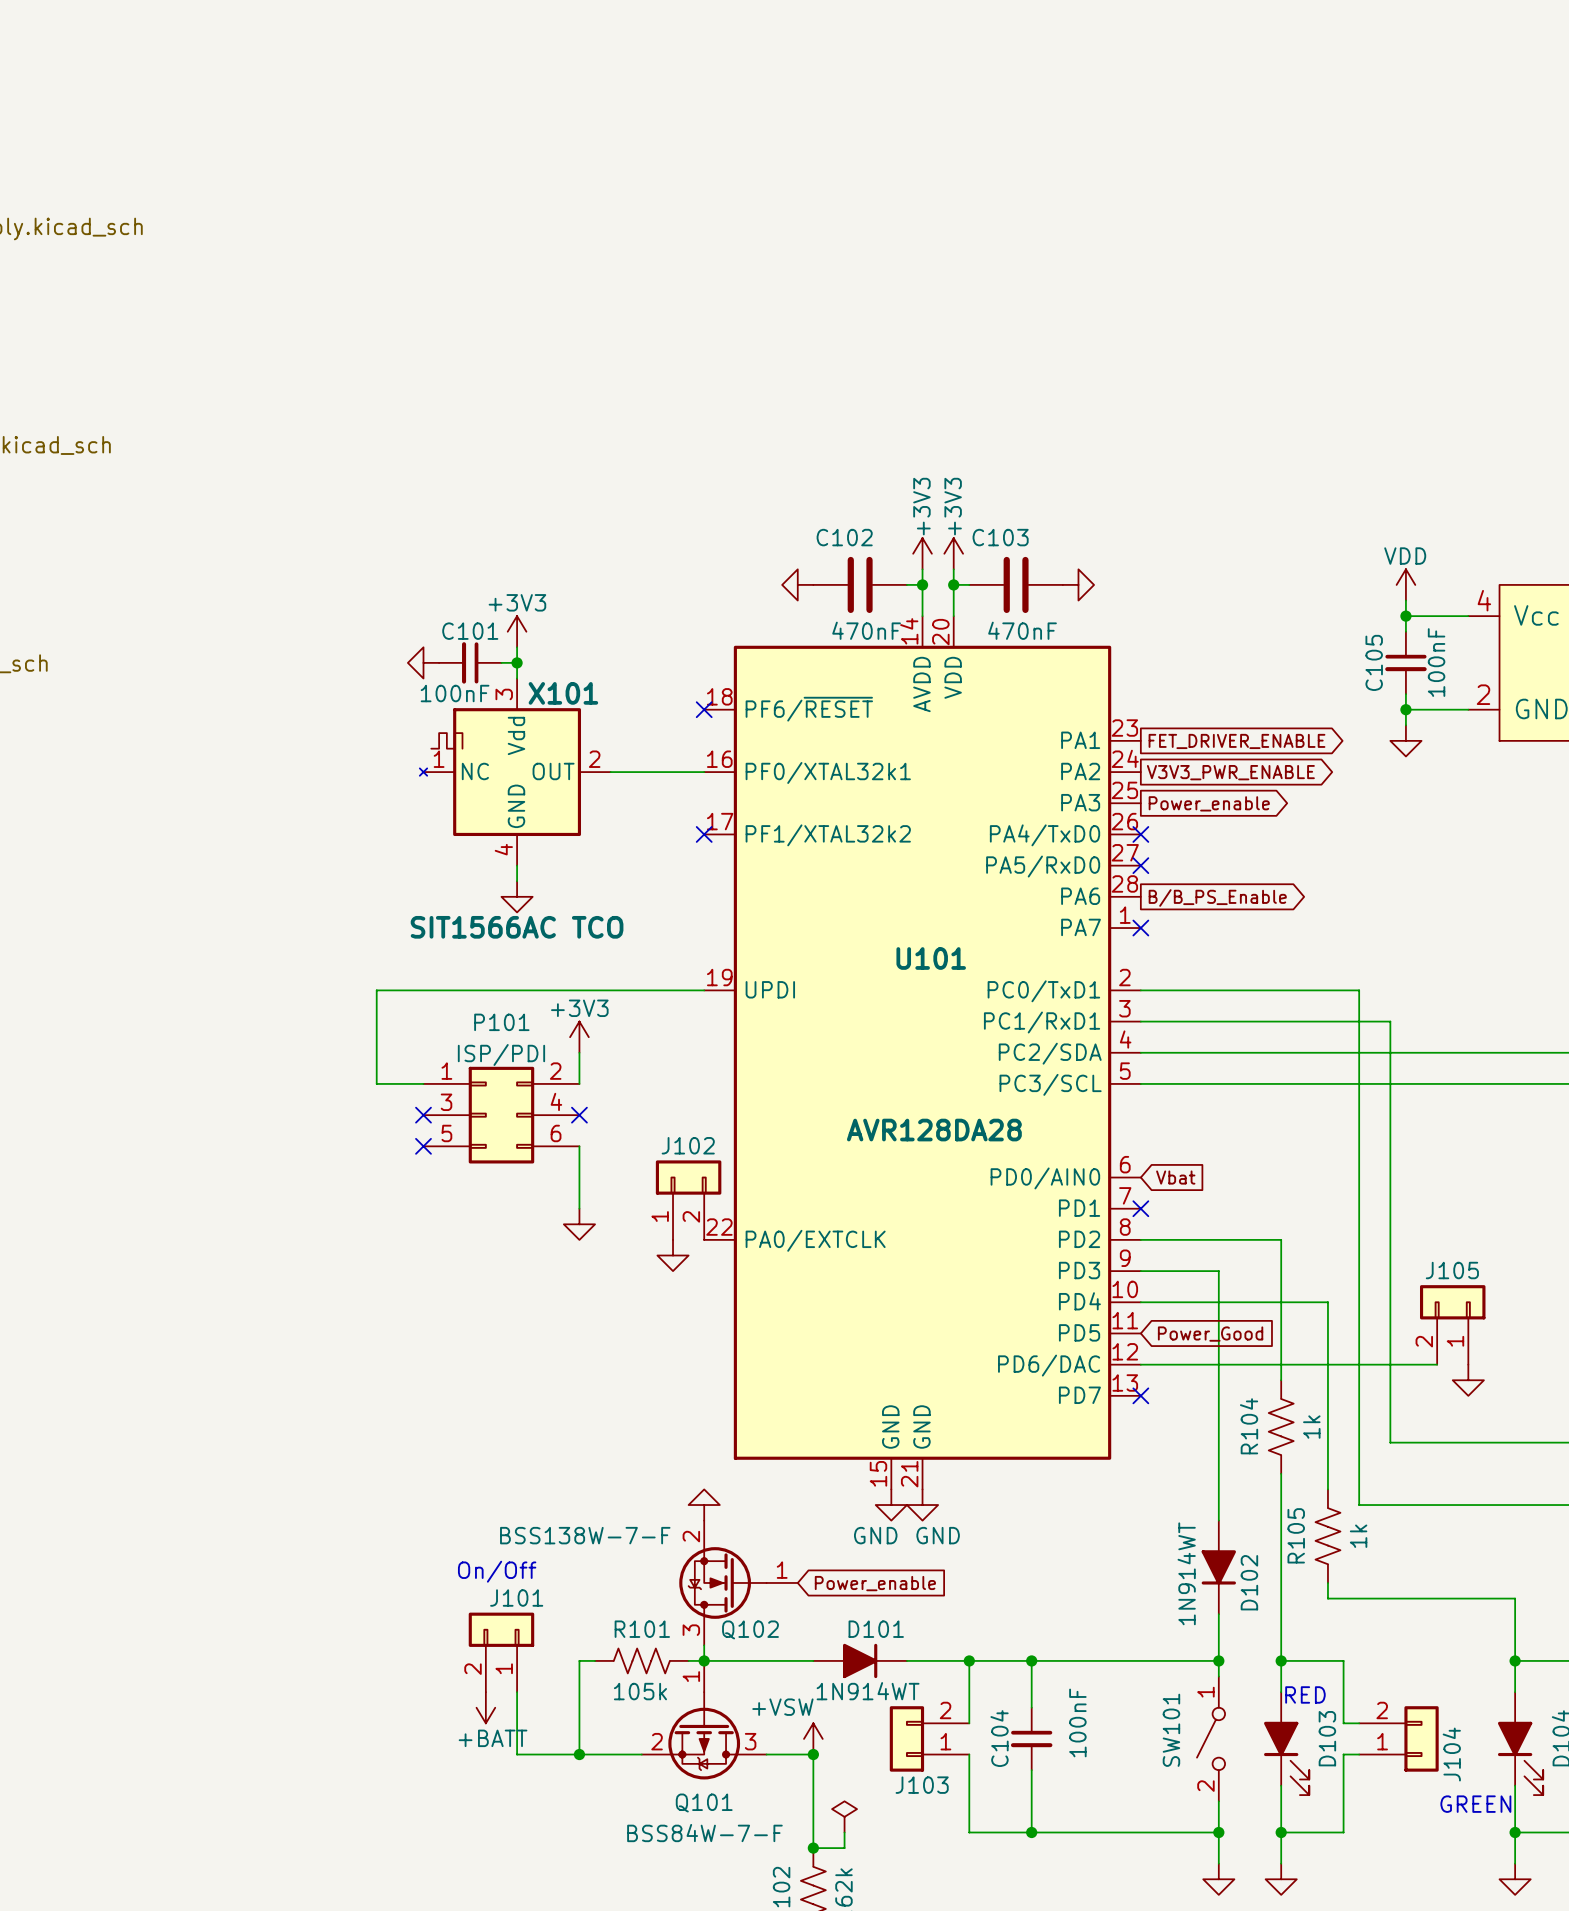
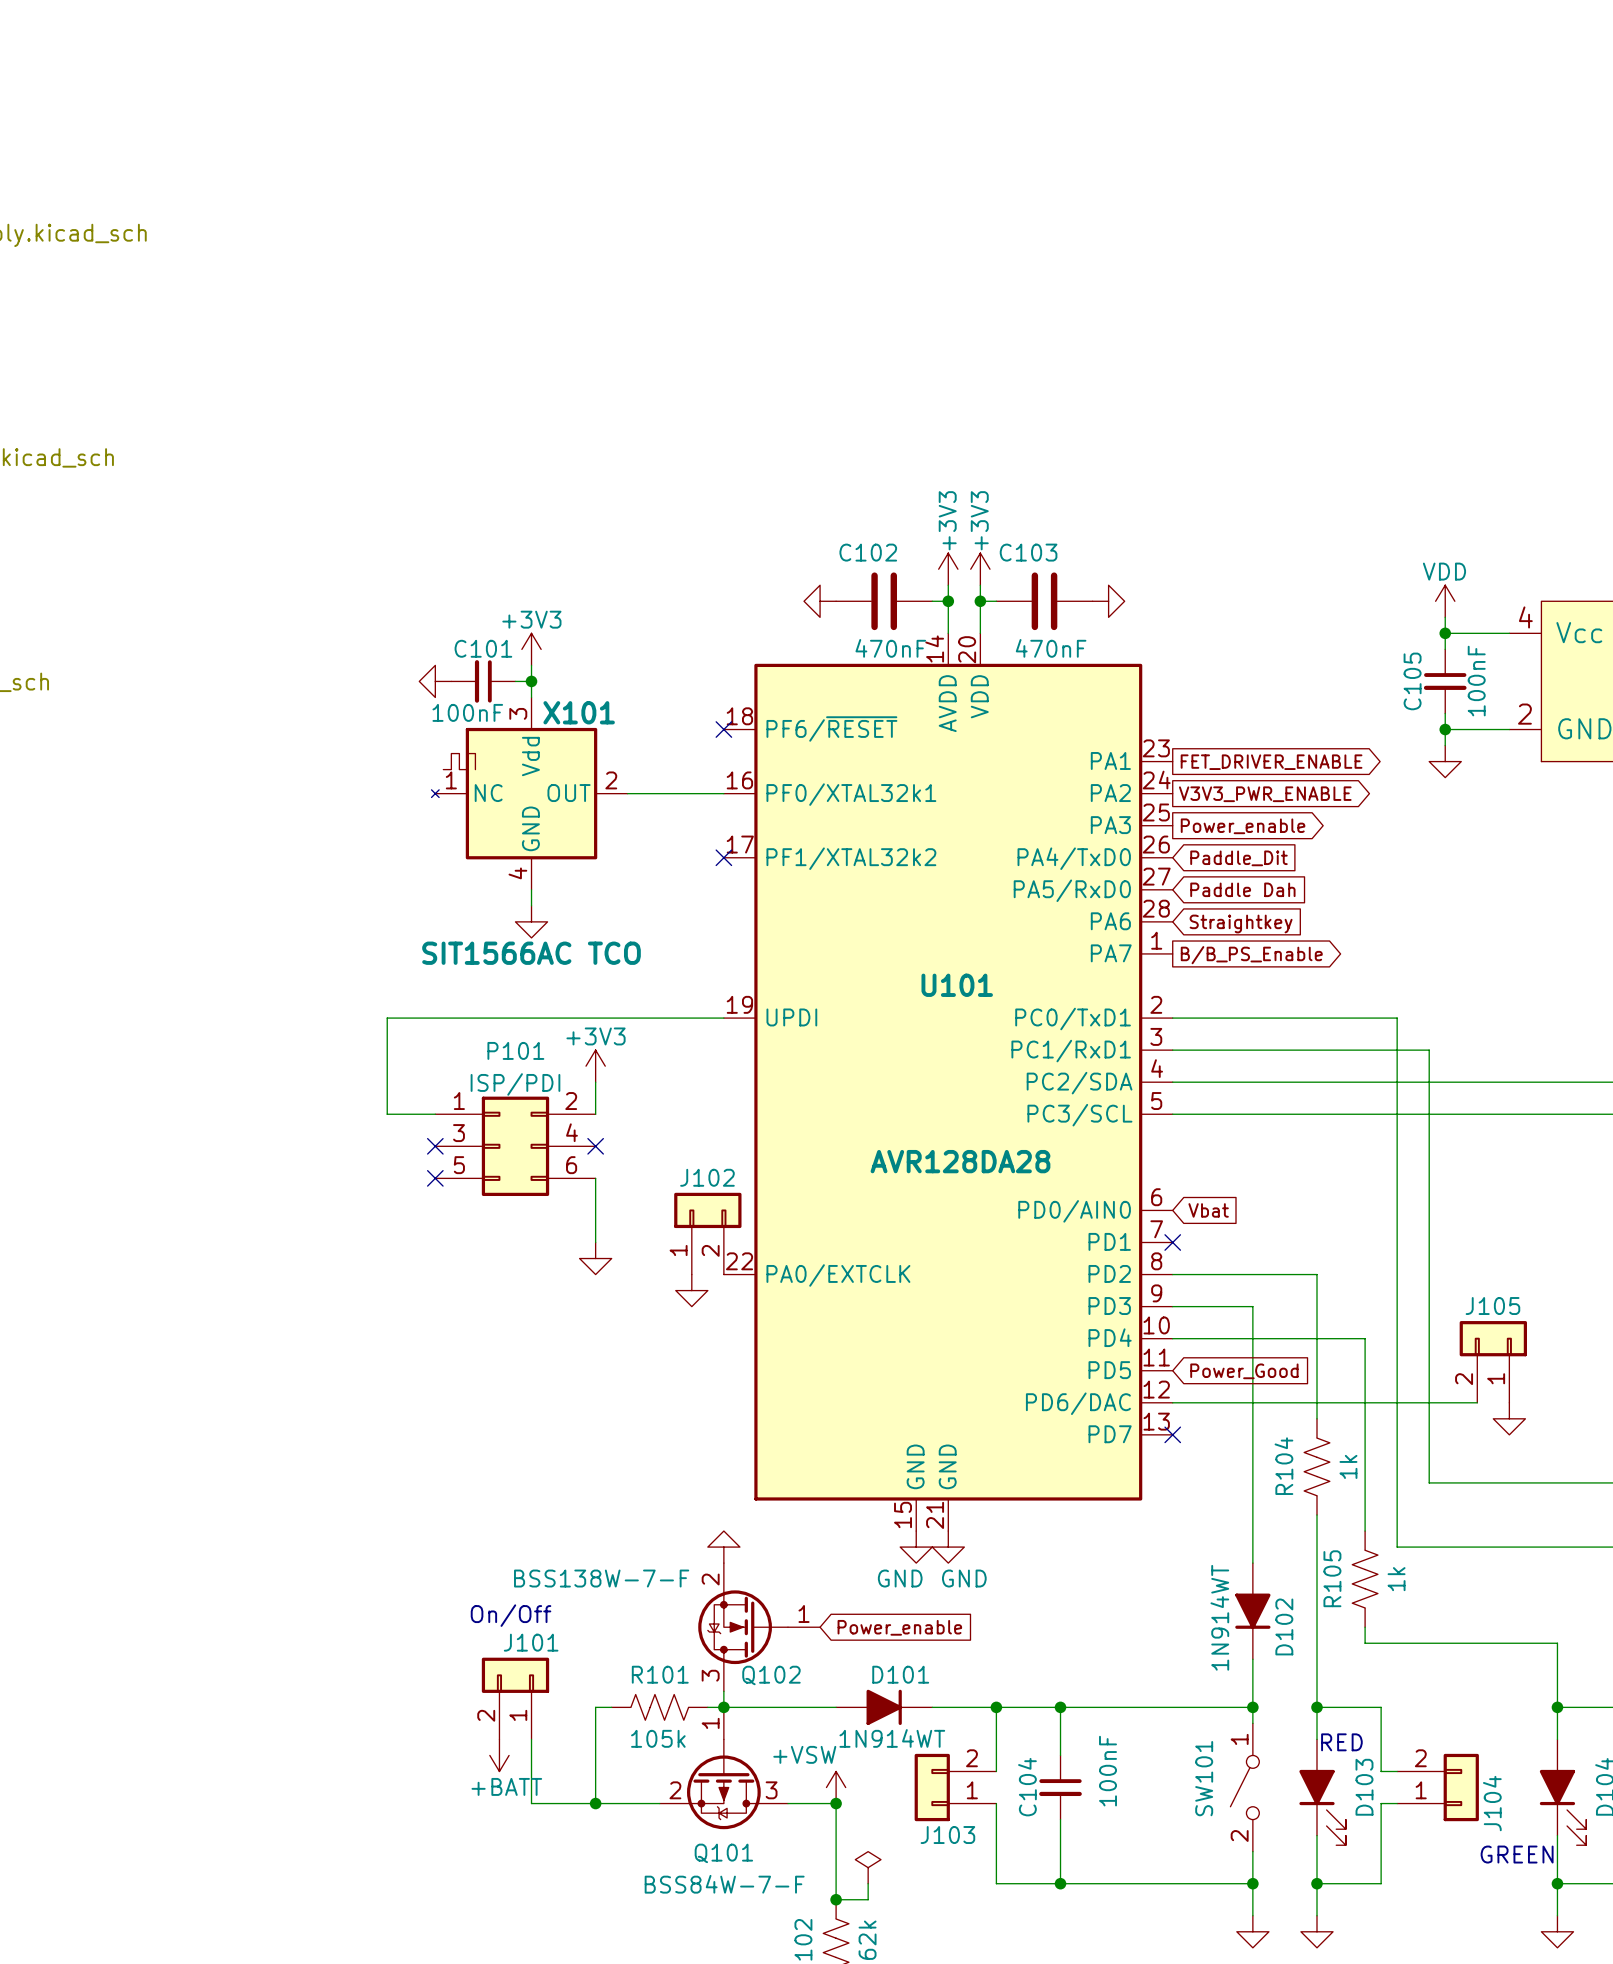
no-connect mark: (1140, 834) -> none
global label: none -> Paddle_Dit (1238, 858)
no-connect mark: (1140, 865) -> none
global label: none -> Paddle Dah (1242, 889)
global label shape: output (1217, 898) -> input (1241, 923)
global label: B/B_PS_Enable (1217, 898) -> Straightkey (1241, 923)
no-connect mark: (1140, 928) -> none
global label: none -> B/B_PS_Enable (1251, 955)

